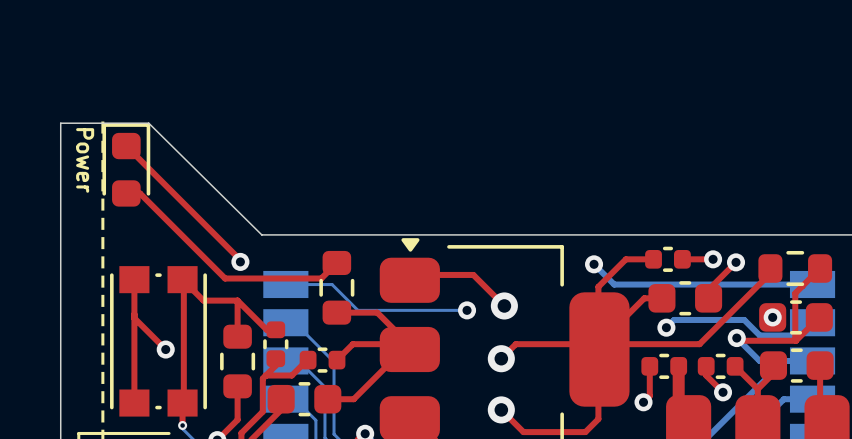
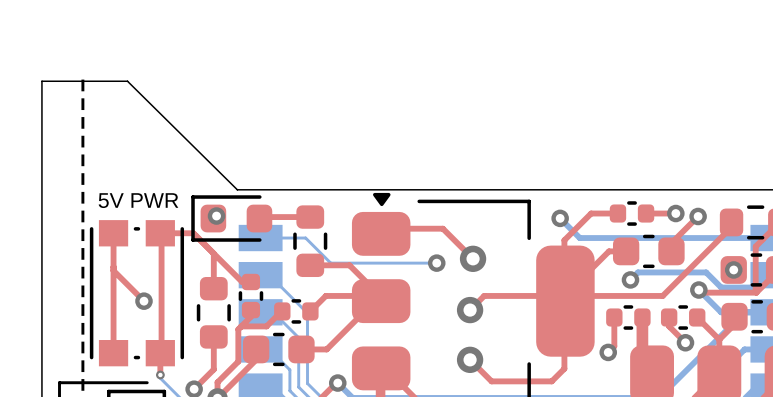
top track: (126, 146) (240, 261) -> none
text: Power (85, 160) -> none
part rotation: 0° (126, 164) -> 90° counterclockwise (231, 218)
part position: (126, 164) -> (231, 218)
top track: (126, 193) (140, 193) (225, 278) (321, 278) (336, 262) -> (259, 218) (310, 217)
text: none -> 5V PWR (138, 200)
top track: (183, 280) (203, 300) (237, 300) -> (160, 233) (193, 233) (213, 253)

